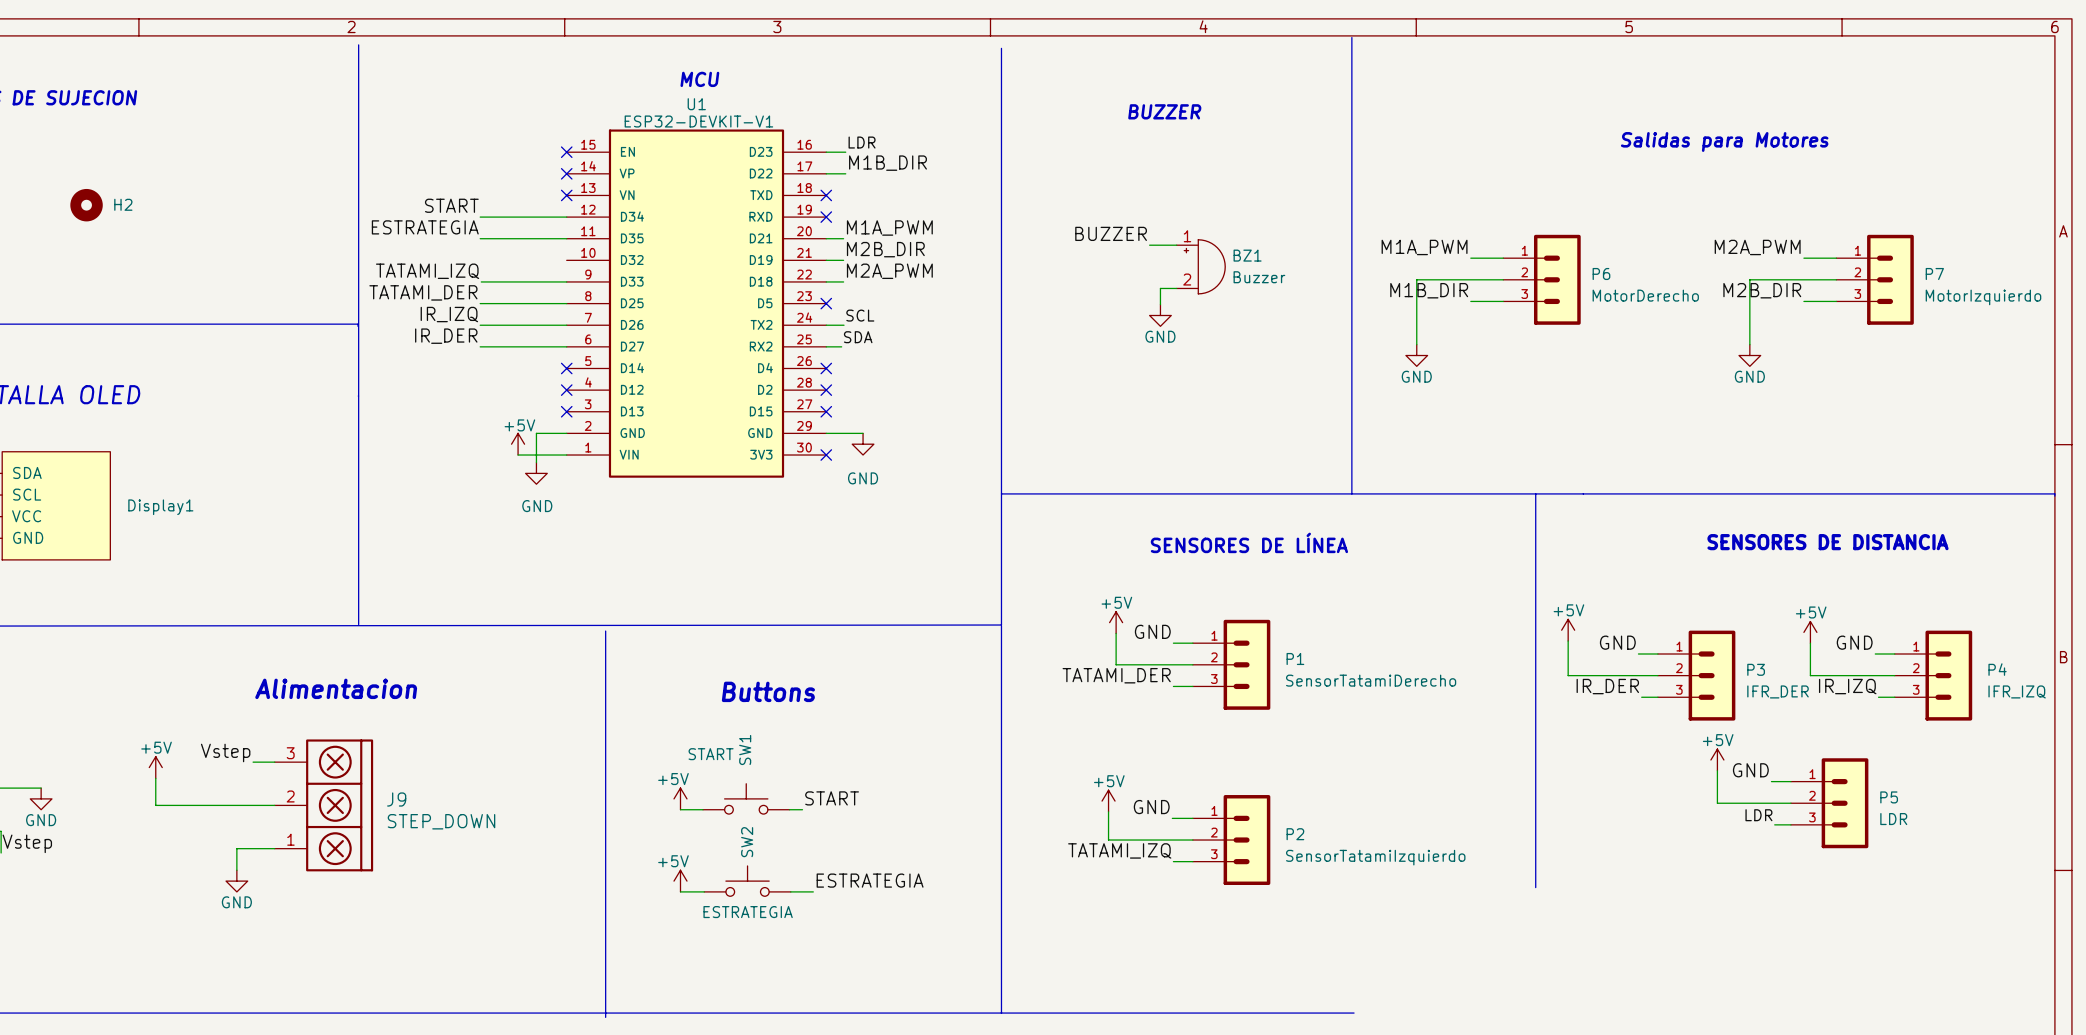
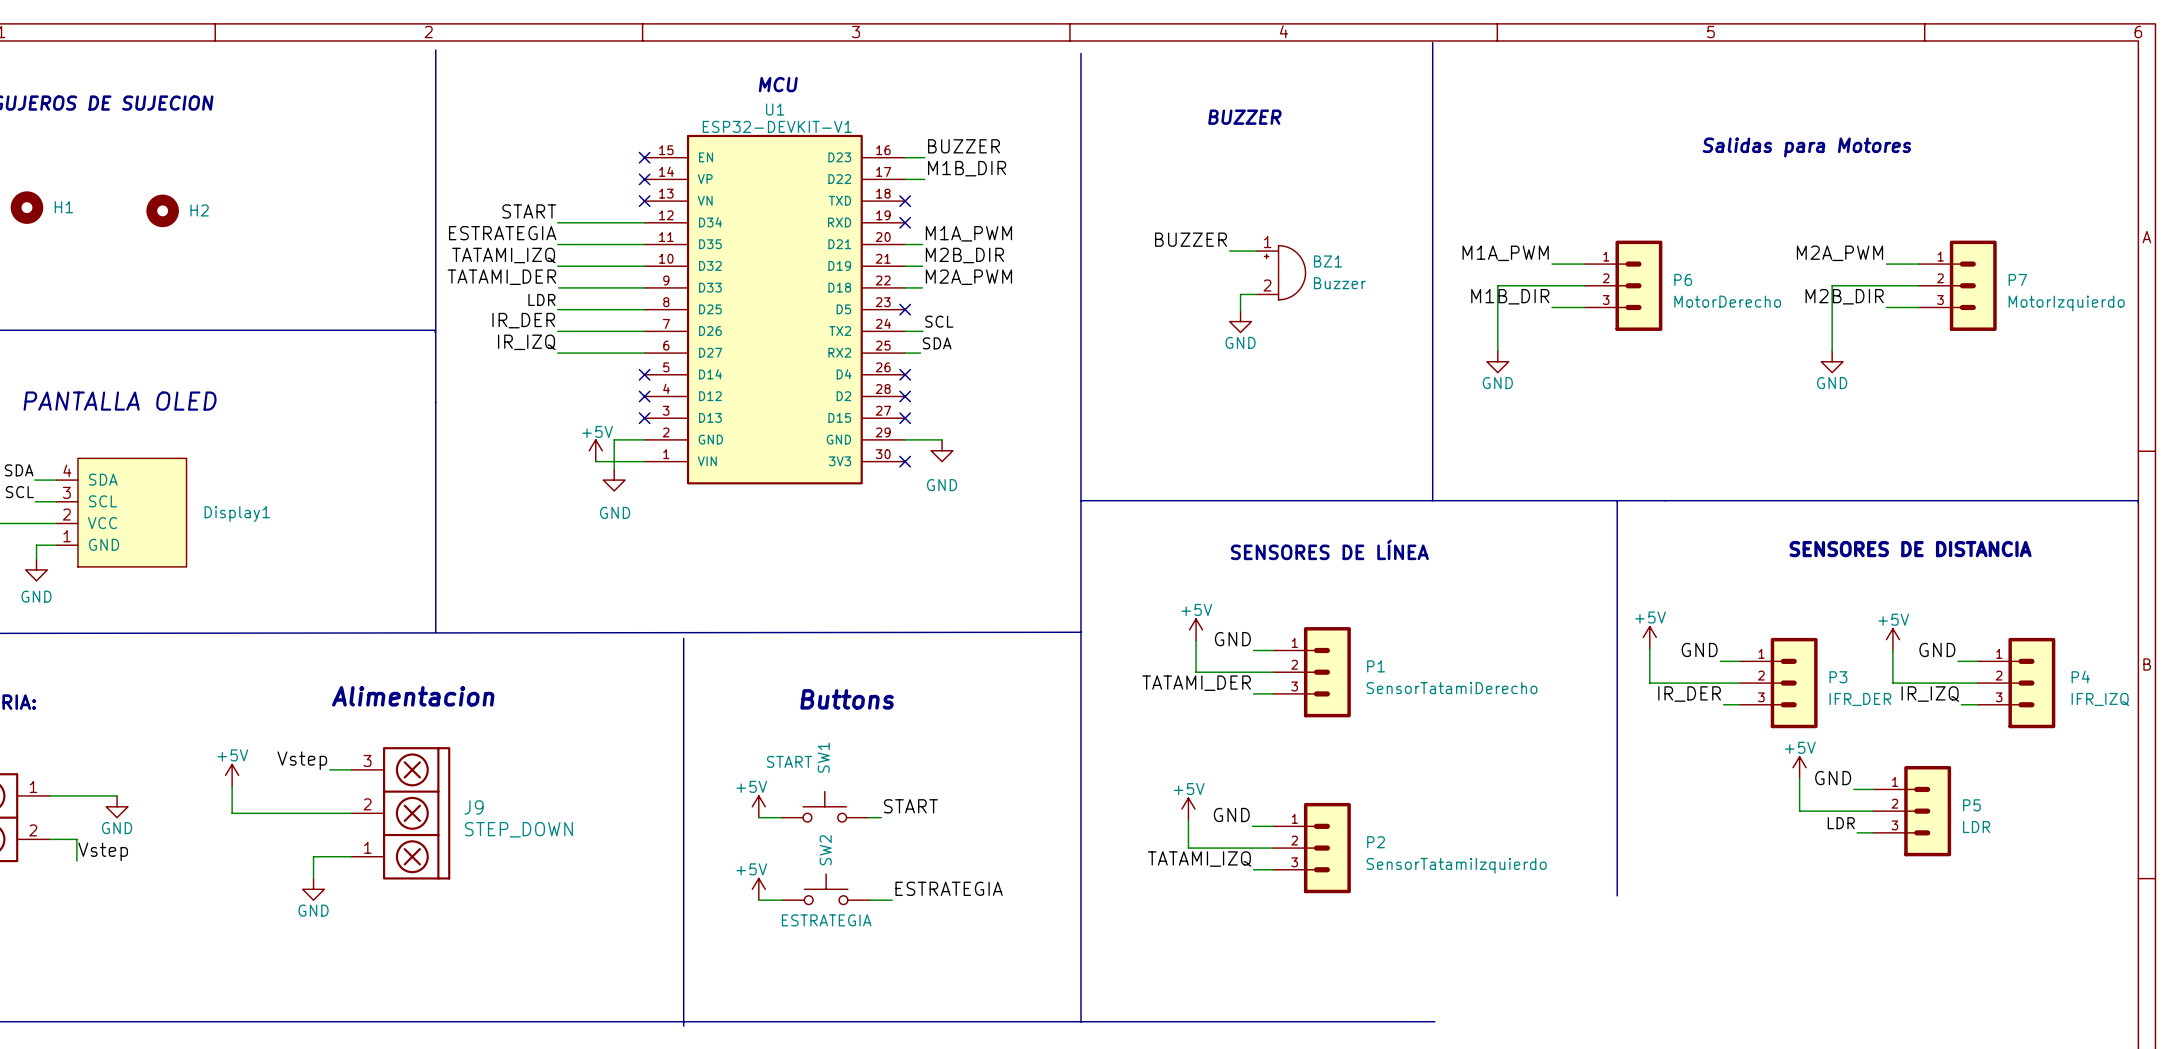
label: LDR (862, 142) -> BUZZER (963, 146)
label: none -> TATAMI_IZQ (503, 255)
wire: none -> (557, 266) (644, 266)
label: TATAMI_IZQ (427, 271) -> TATAMI_DER (501, 277)
label: TATAMI_DER (423, 292) -> LDR (541, 299)
label: IR_IZQ (449, 314) -> IR_DER (523, 320)
label: IR_DER (446, 336) -> IR_IZQ (526, 342)

